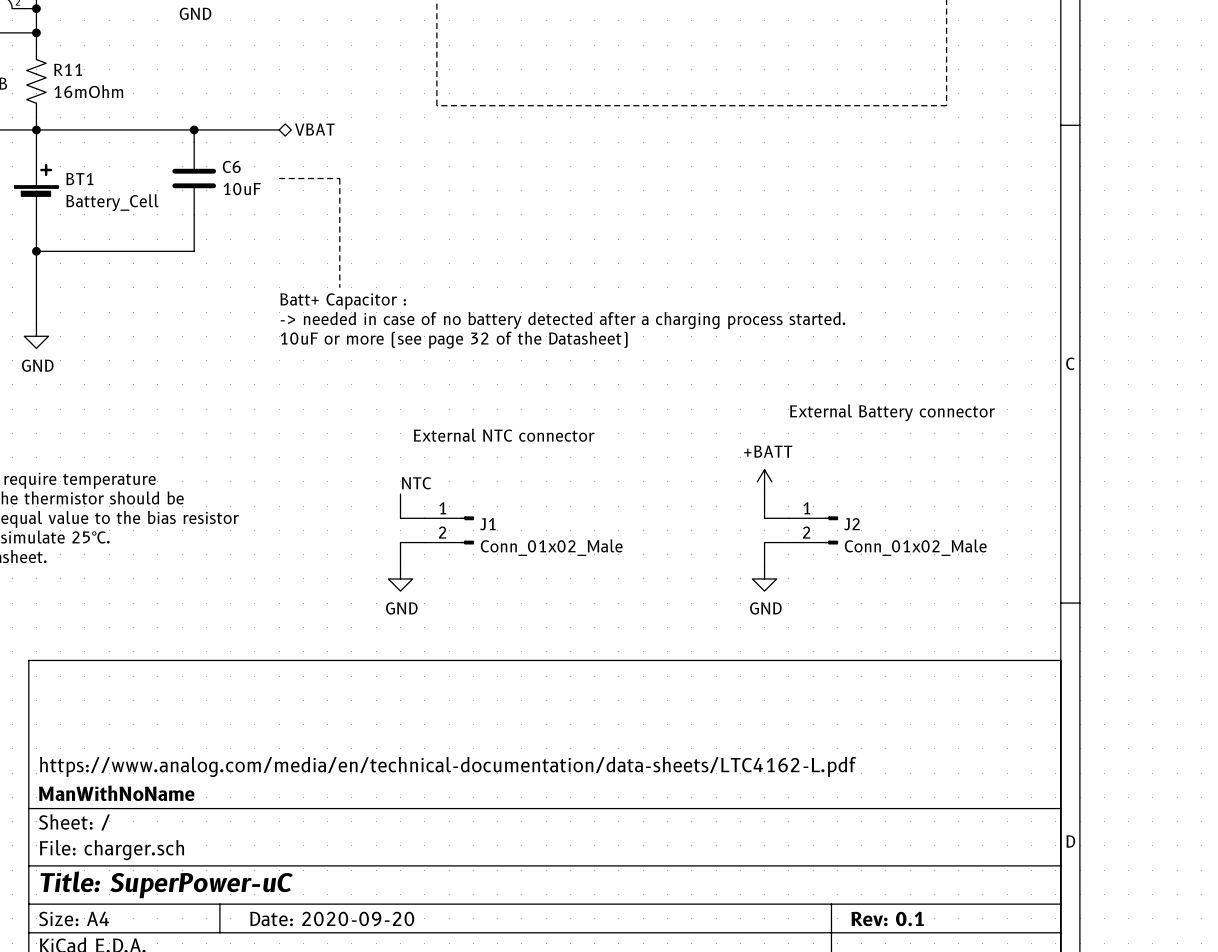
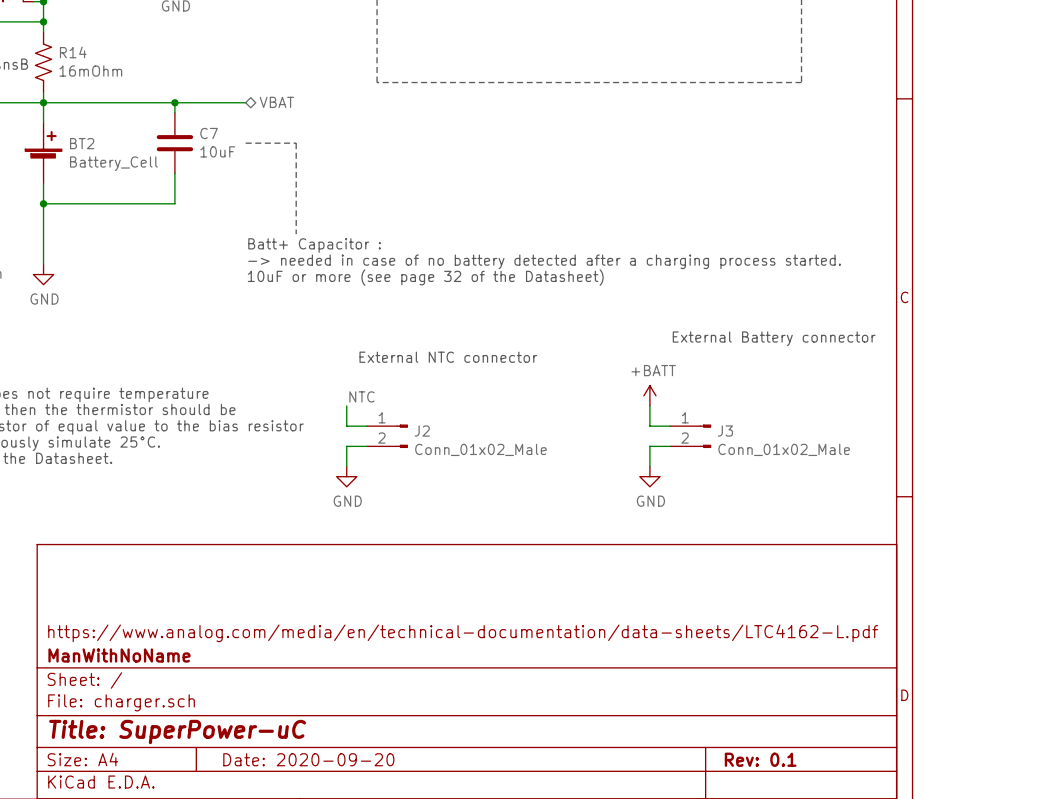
R11 name: R11 (68, 69) -> R14 (73, 52)
C6 name: C6 (231, 166) -> C7 (209, 133)
BT1 name: BT1 (79, 179) -> BT2 (82, 143)
J1 name: J1 (487, 524) -> J2 (422, 431)
J2 name: J2 (851, 524) -> J3 (725, 431)

